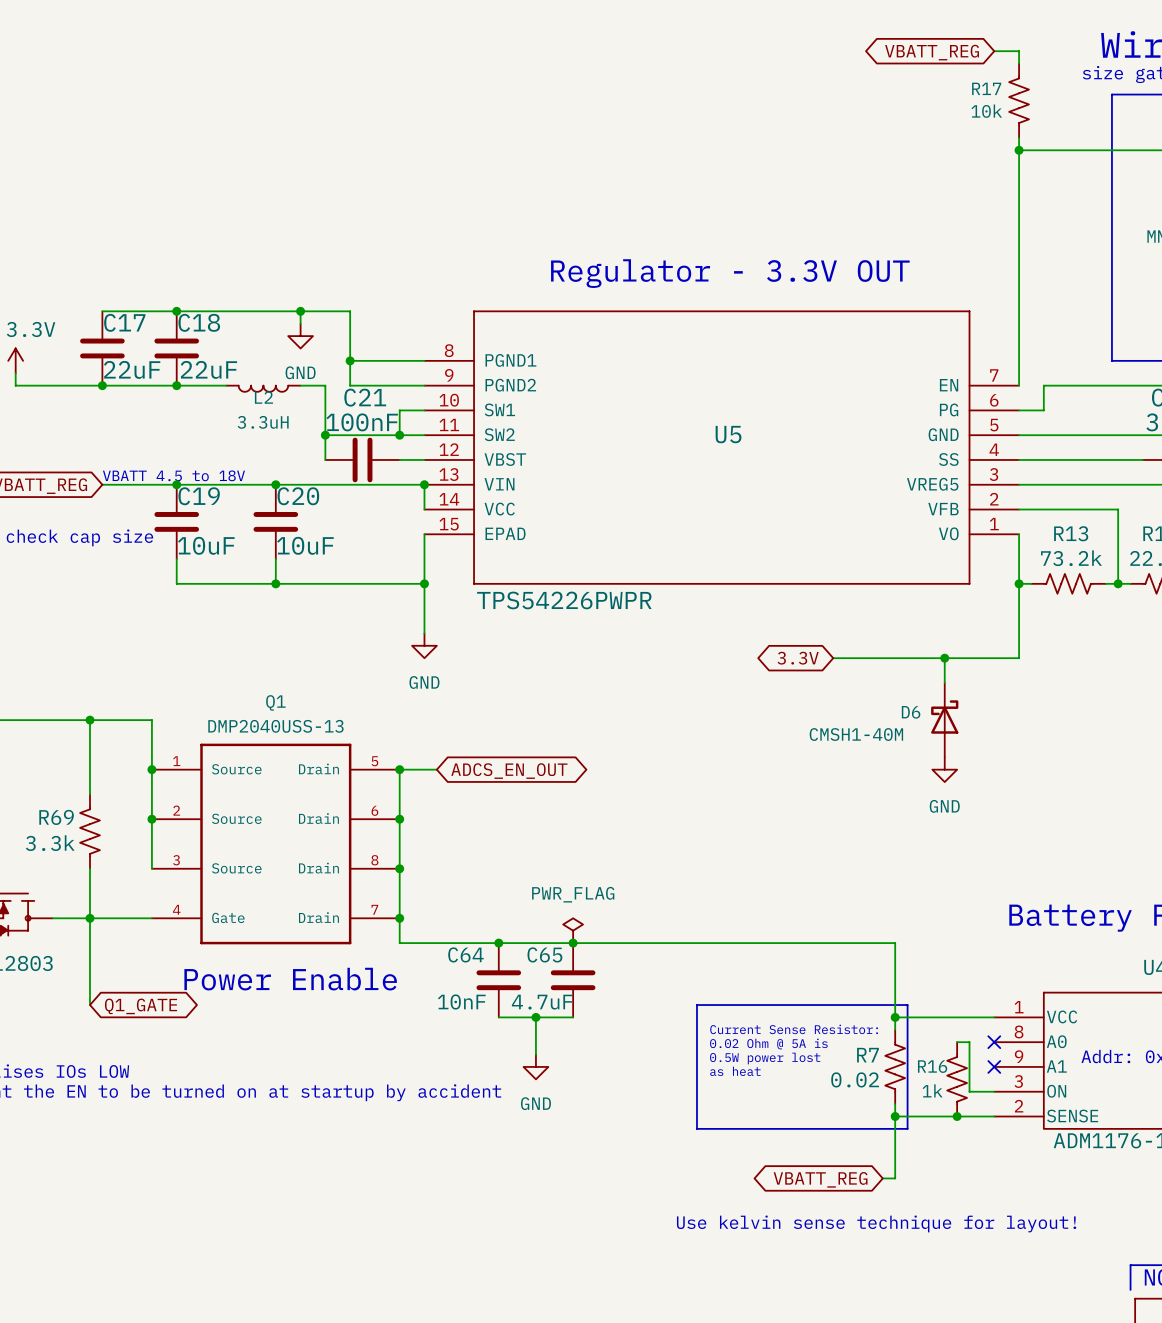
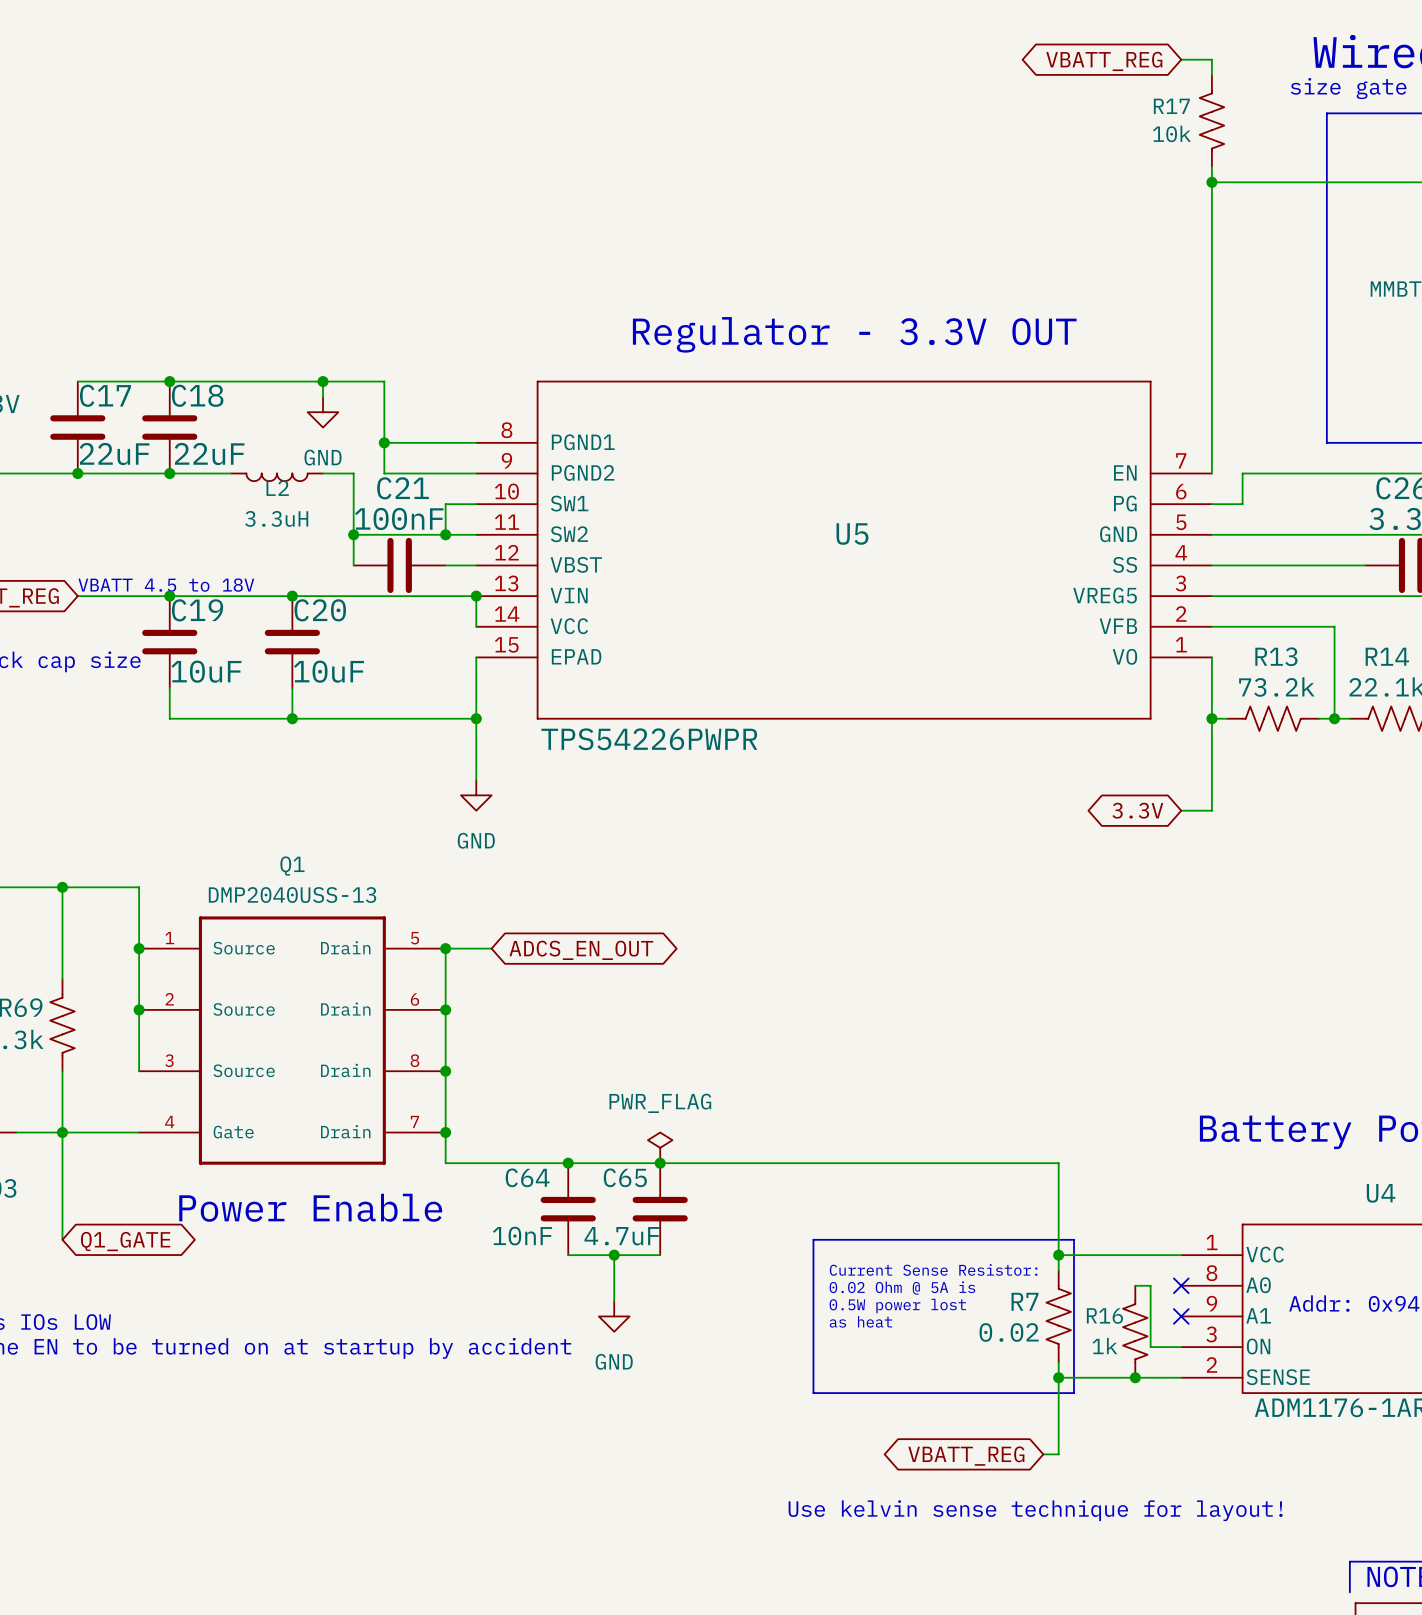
global label position: 3.3V (798, 658) -> 3.3V (1137, 810)
wire: (833, 658) (994, 658) -> none
wire: (944, 658) (944, 682) -> none
junction: (944, 658) -> none
D6: CMSH1-40M (944, 720) -> none
power symbol: GND (944, 769) -> none

